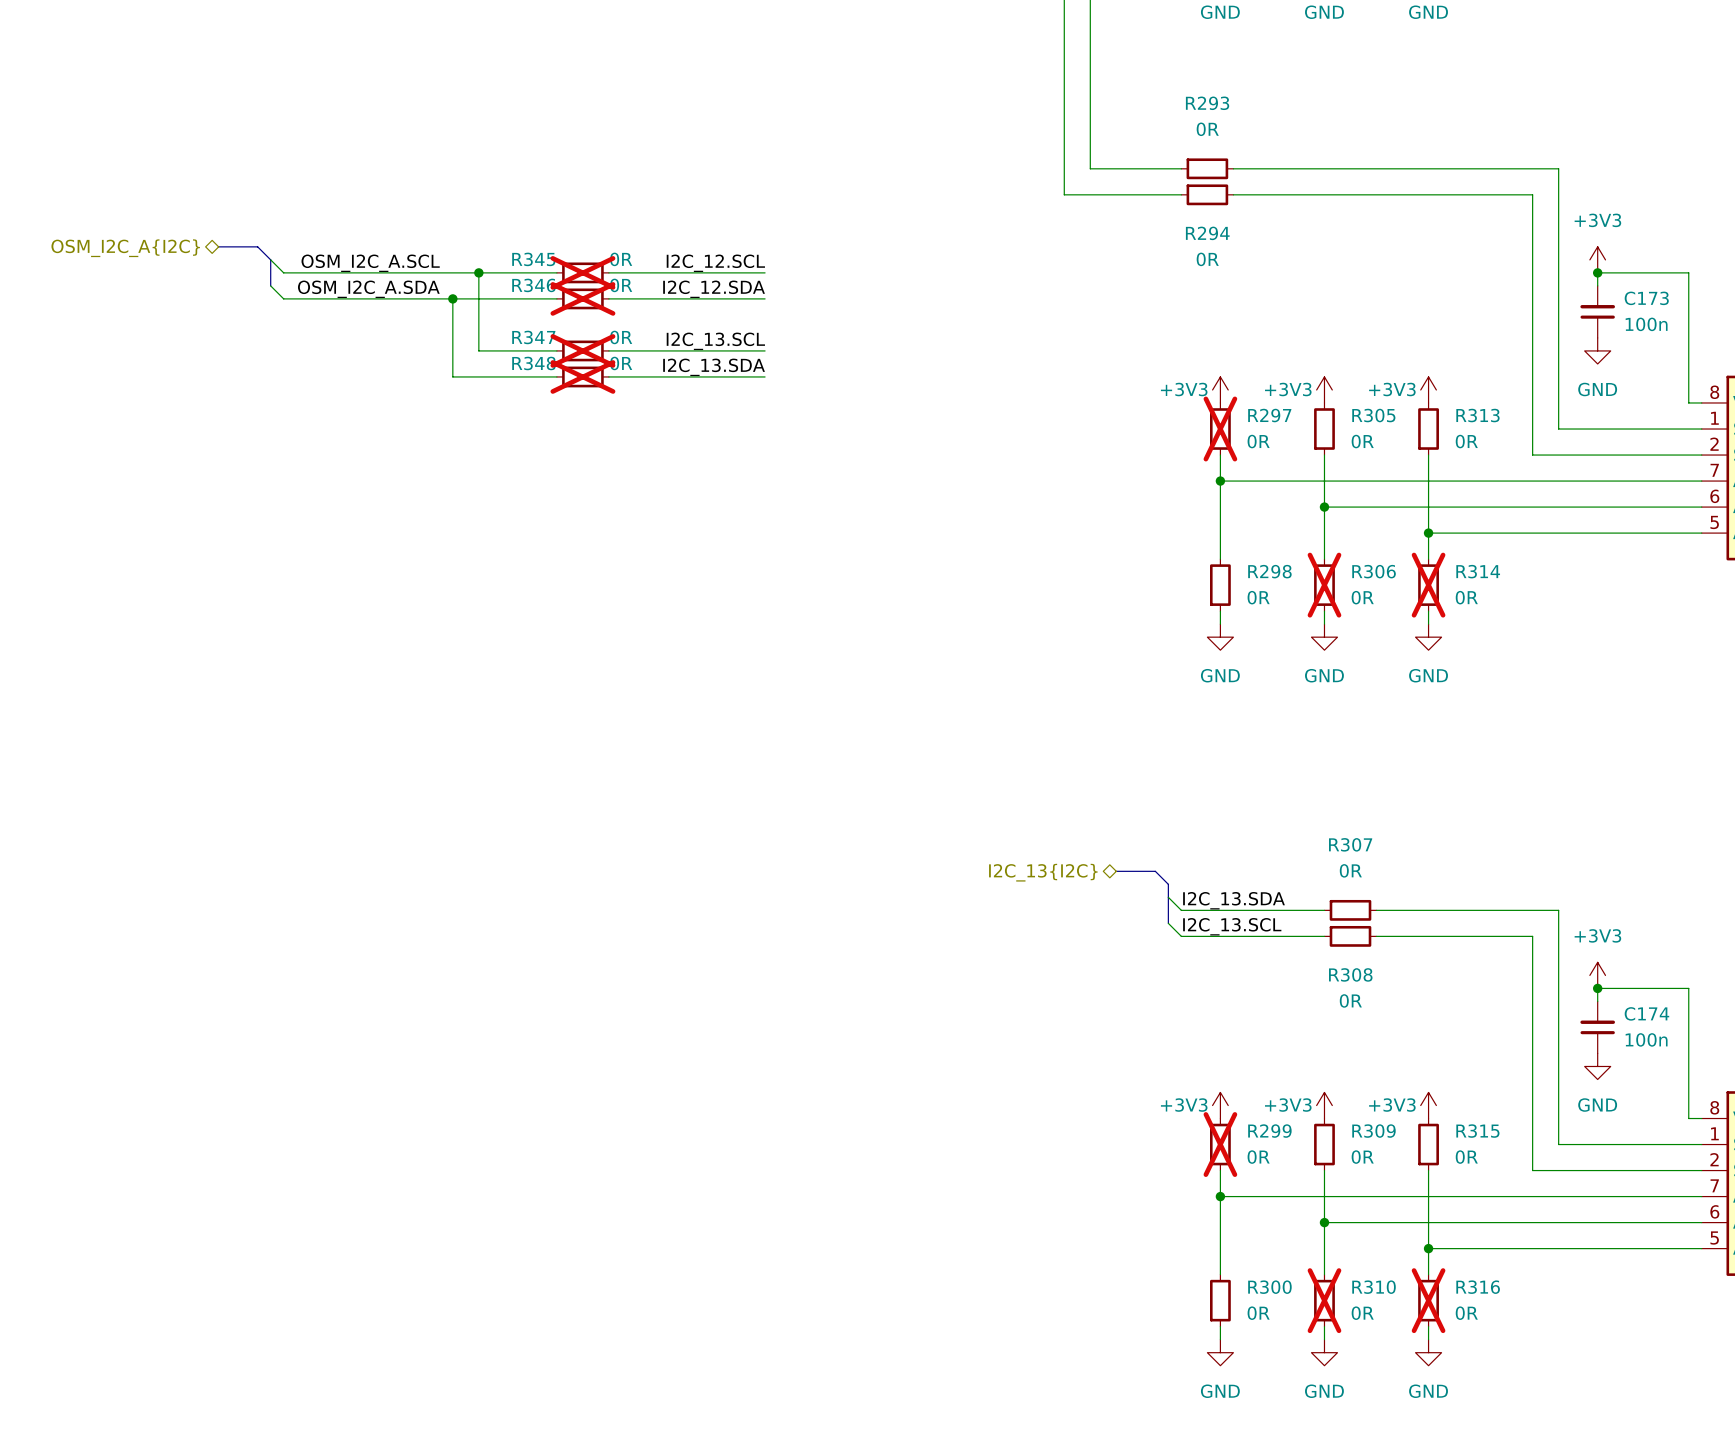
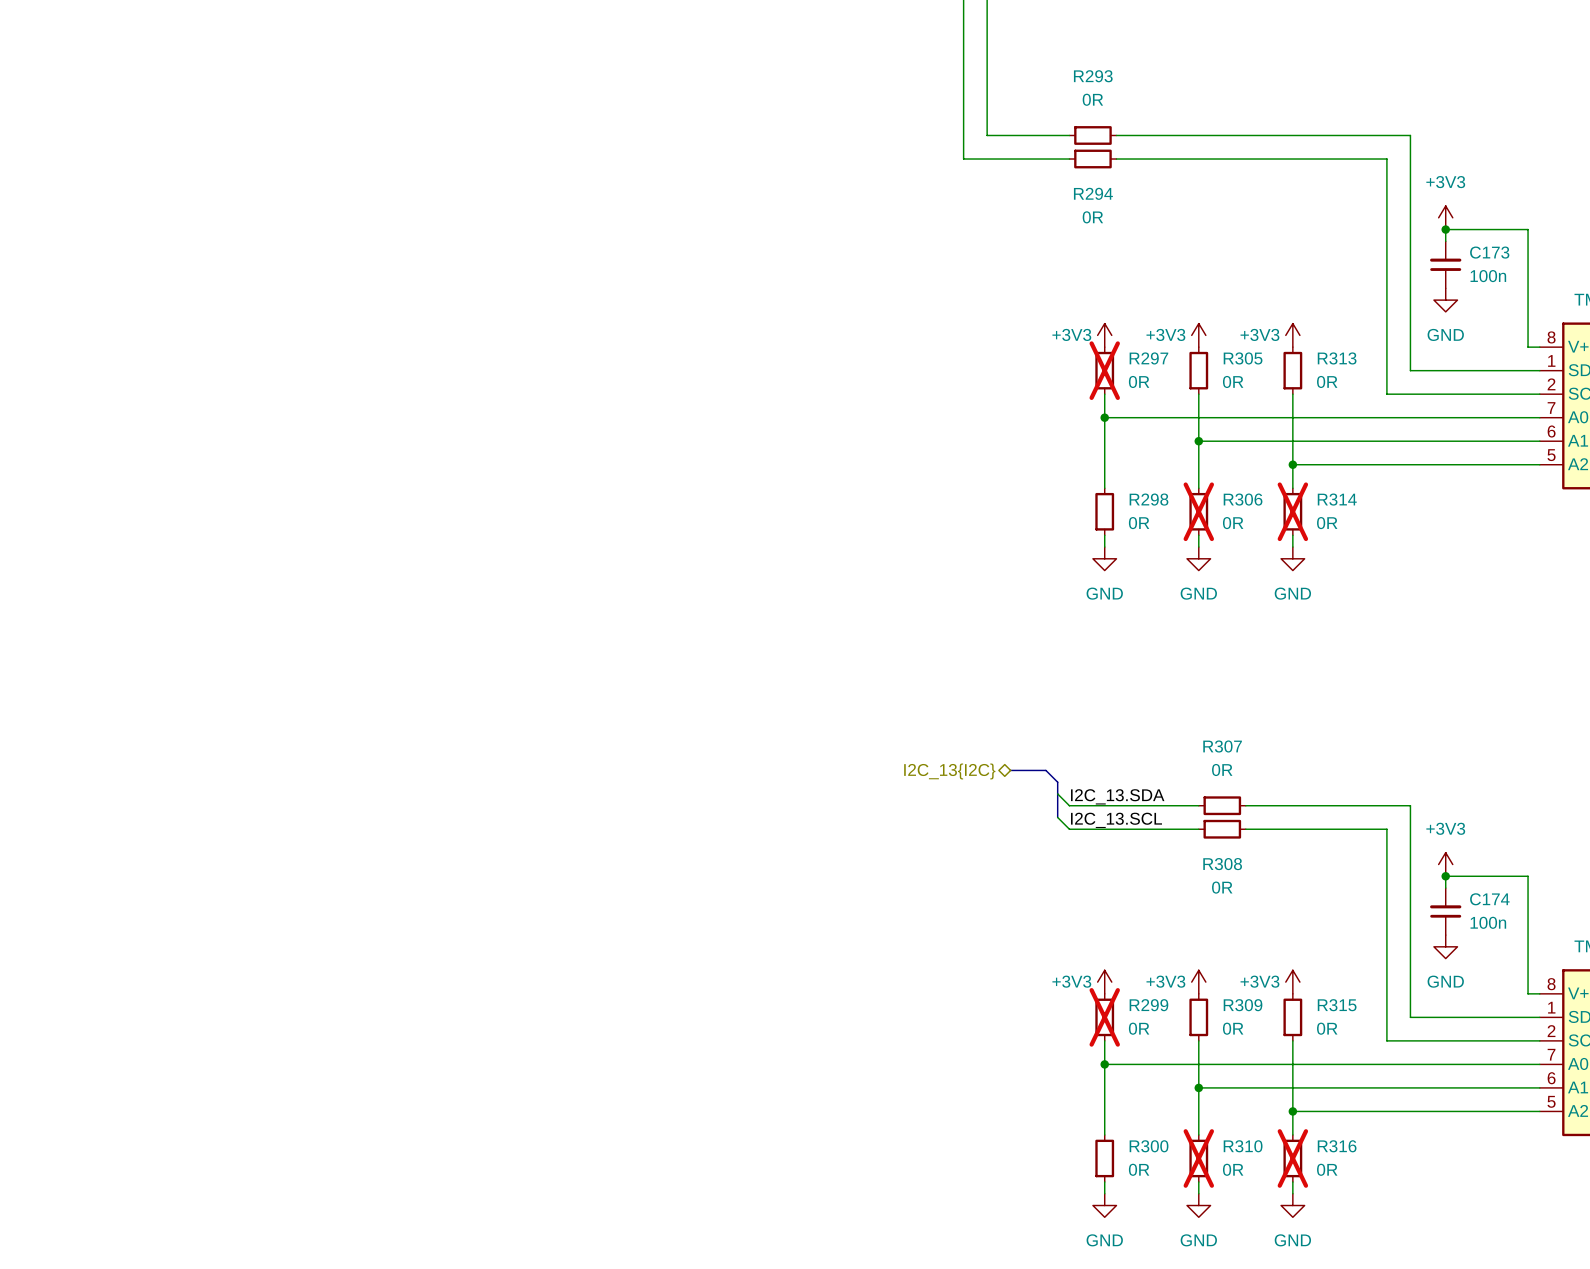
bus: (218, 246) (257, 246) (270, 259) (270, 285) -> none
hierarchical label: OSM_I2C_A{I2C} (125, 248) -> none
wire: (270, 259) (283, 272) (556, 272) -> none
label: OSM_I2C_A.SCL (370, 263) -> none
label: I2C_12.SCL (715, 263) -> none
wire: (478, 272) (478, 350) (556, 350) -> none
junction: (478, 272) -> none
R345: (582, 272) -> none
wire: (608, 272) (765, 272) -> none
wire: (270, 285) (283, 298) (556, 298) -> none
label: OSM_I2C_A.SDA (368, 289) -> none
label: I2C_12.SDA (714, 289) -> none
wire: (452, 298) (452, 376) (556, 376) -> none
junction: (452, 298) -> none
R346: (582, 298) -> none
wire: (608, 298) (765, 298) -> none
label: I2C_13.SCL (715, 341) -> none
R347: (582, 350) -> none
wire: (608, 350) (765, 350) -> none
label: I2C_13.SDA (714, 367) -> none
R348: (582, 376) -> none
wire: (608, 376) (765, 376) -> none

